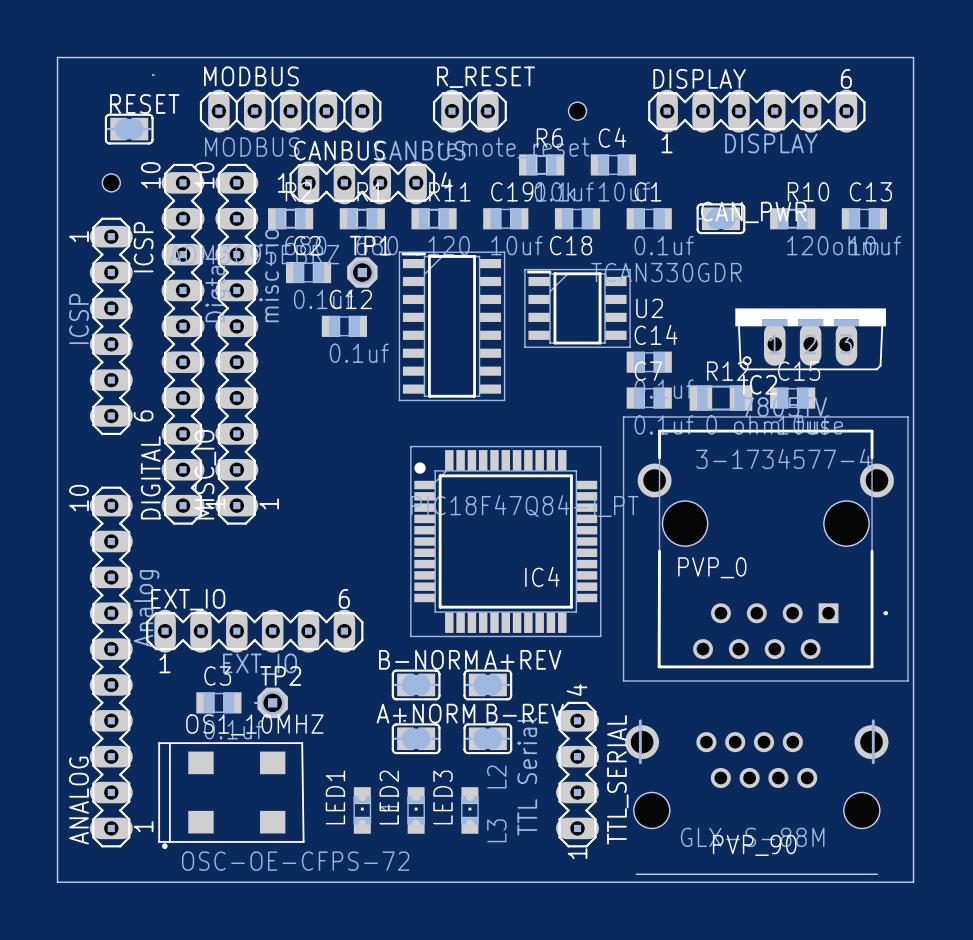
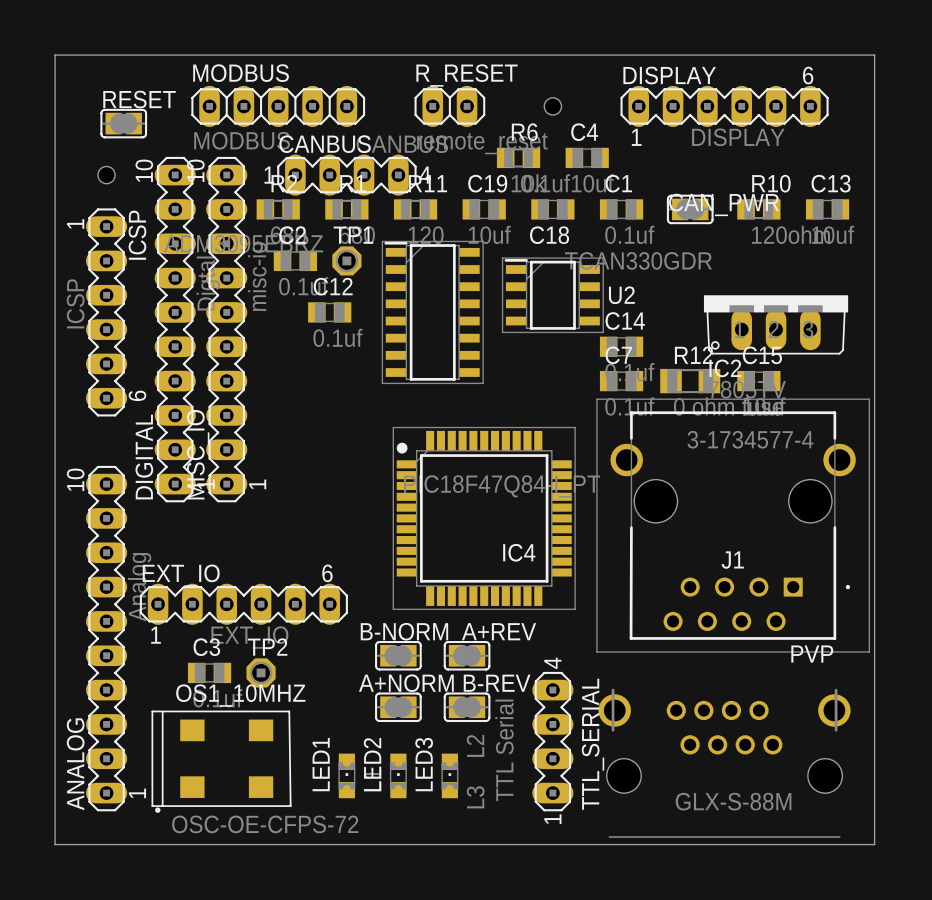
PVP_0 name: PVP_0 (712, 567) -> J1 (732, 560)
PVP_90 name: PVP_90 (754, 845) -> PVP (812, 654)

